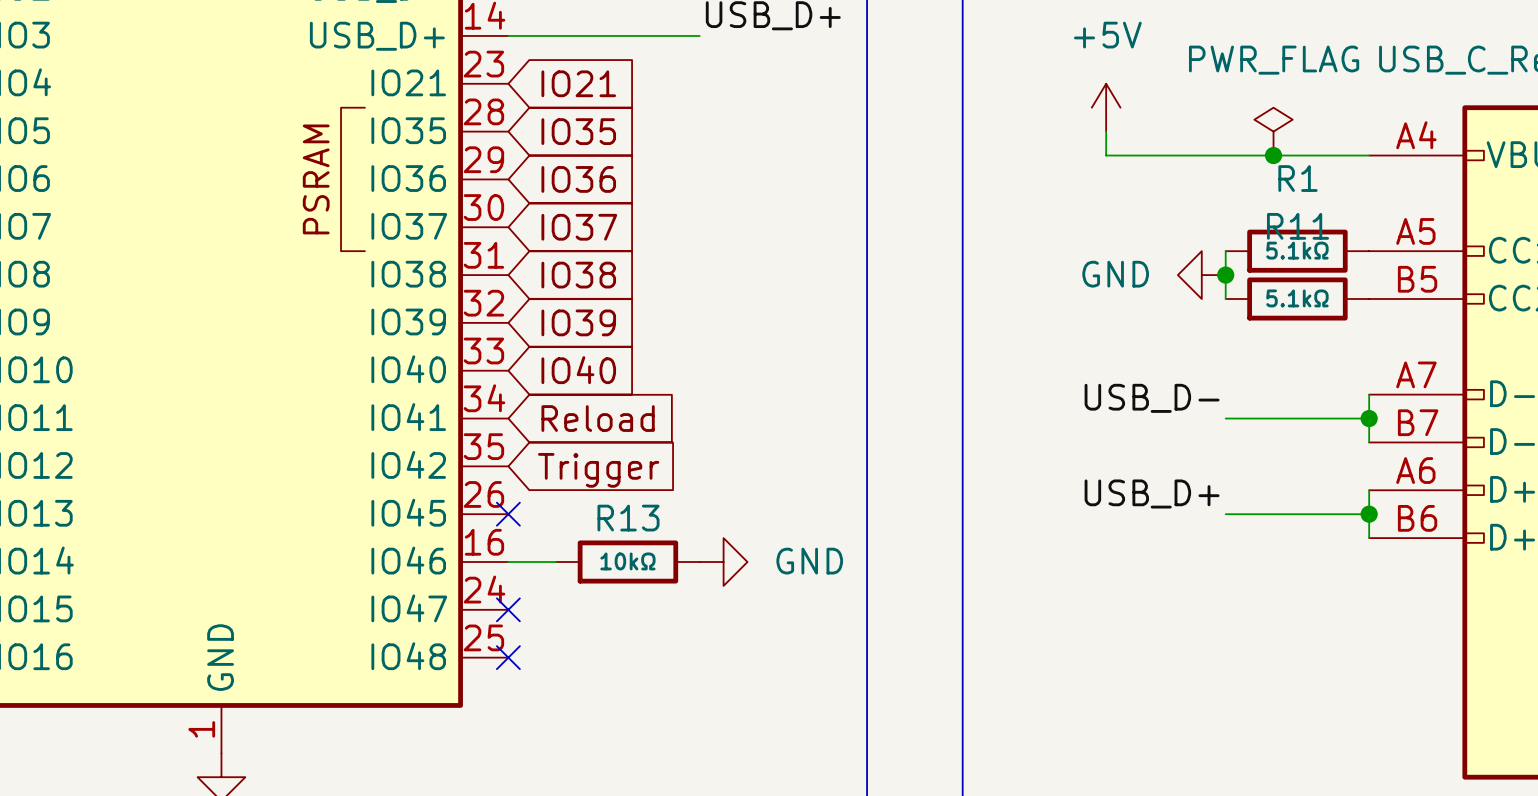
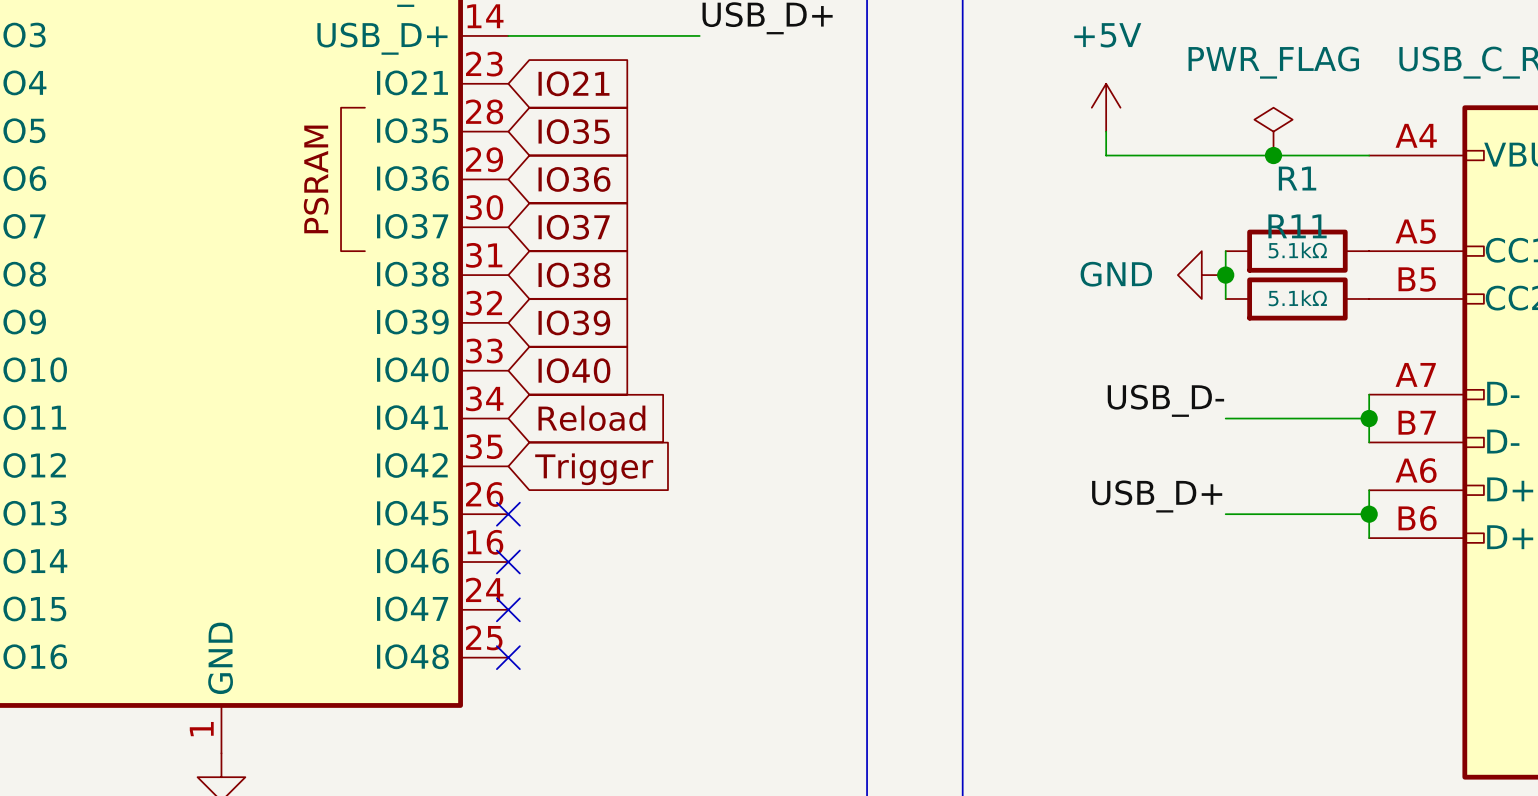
wire: (508, 562) (556, 562) -> none
no-connect mark: none -> (508, 562)
R13: 10kΩ (627, 562) -> none
power symbol: GND (723, 562) -> none

